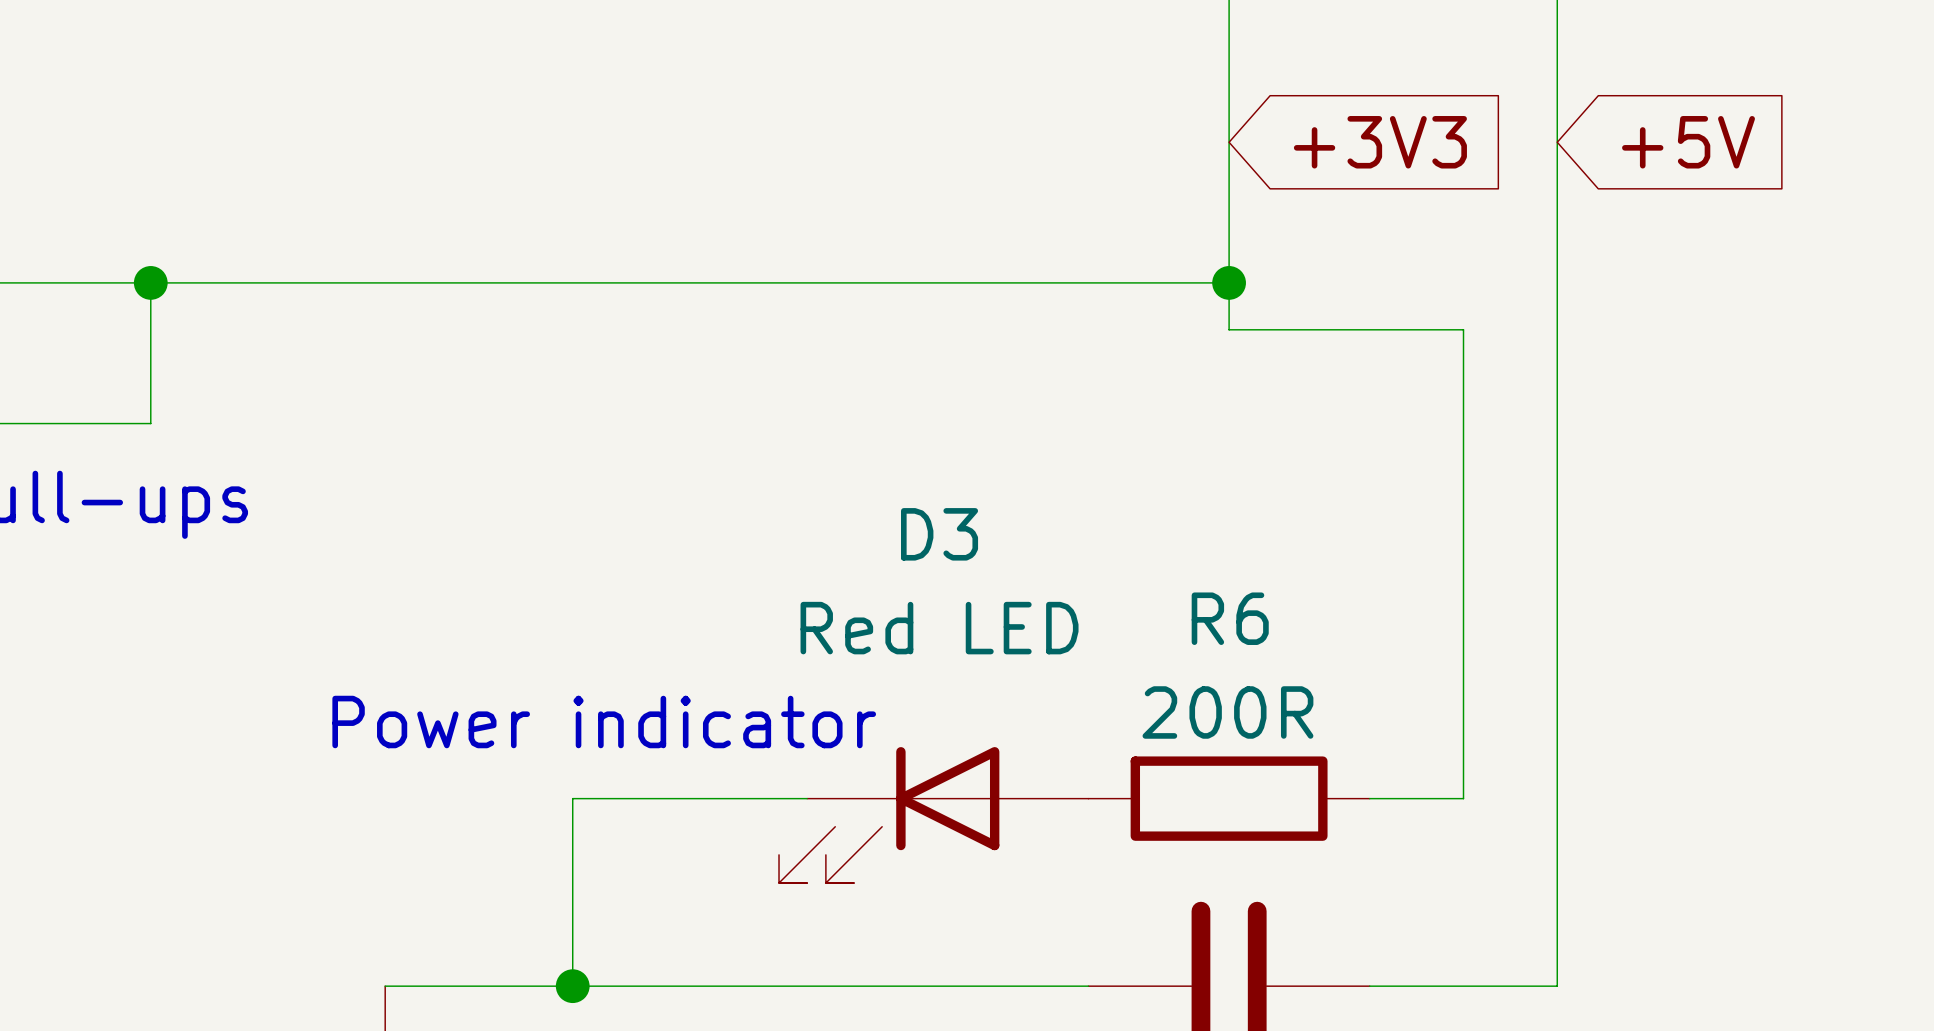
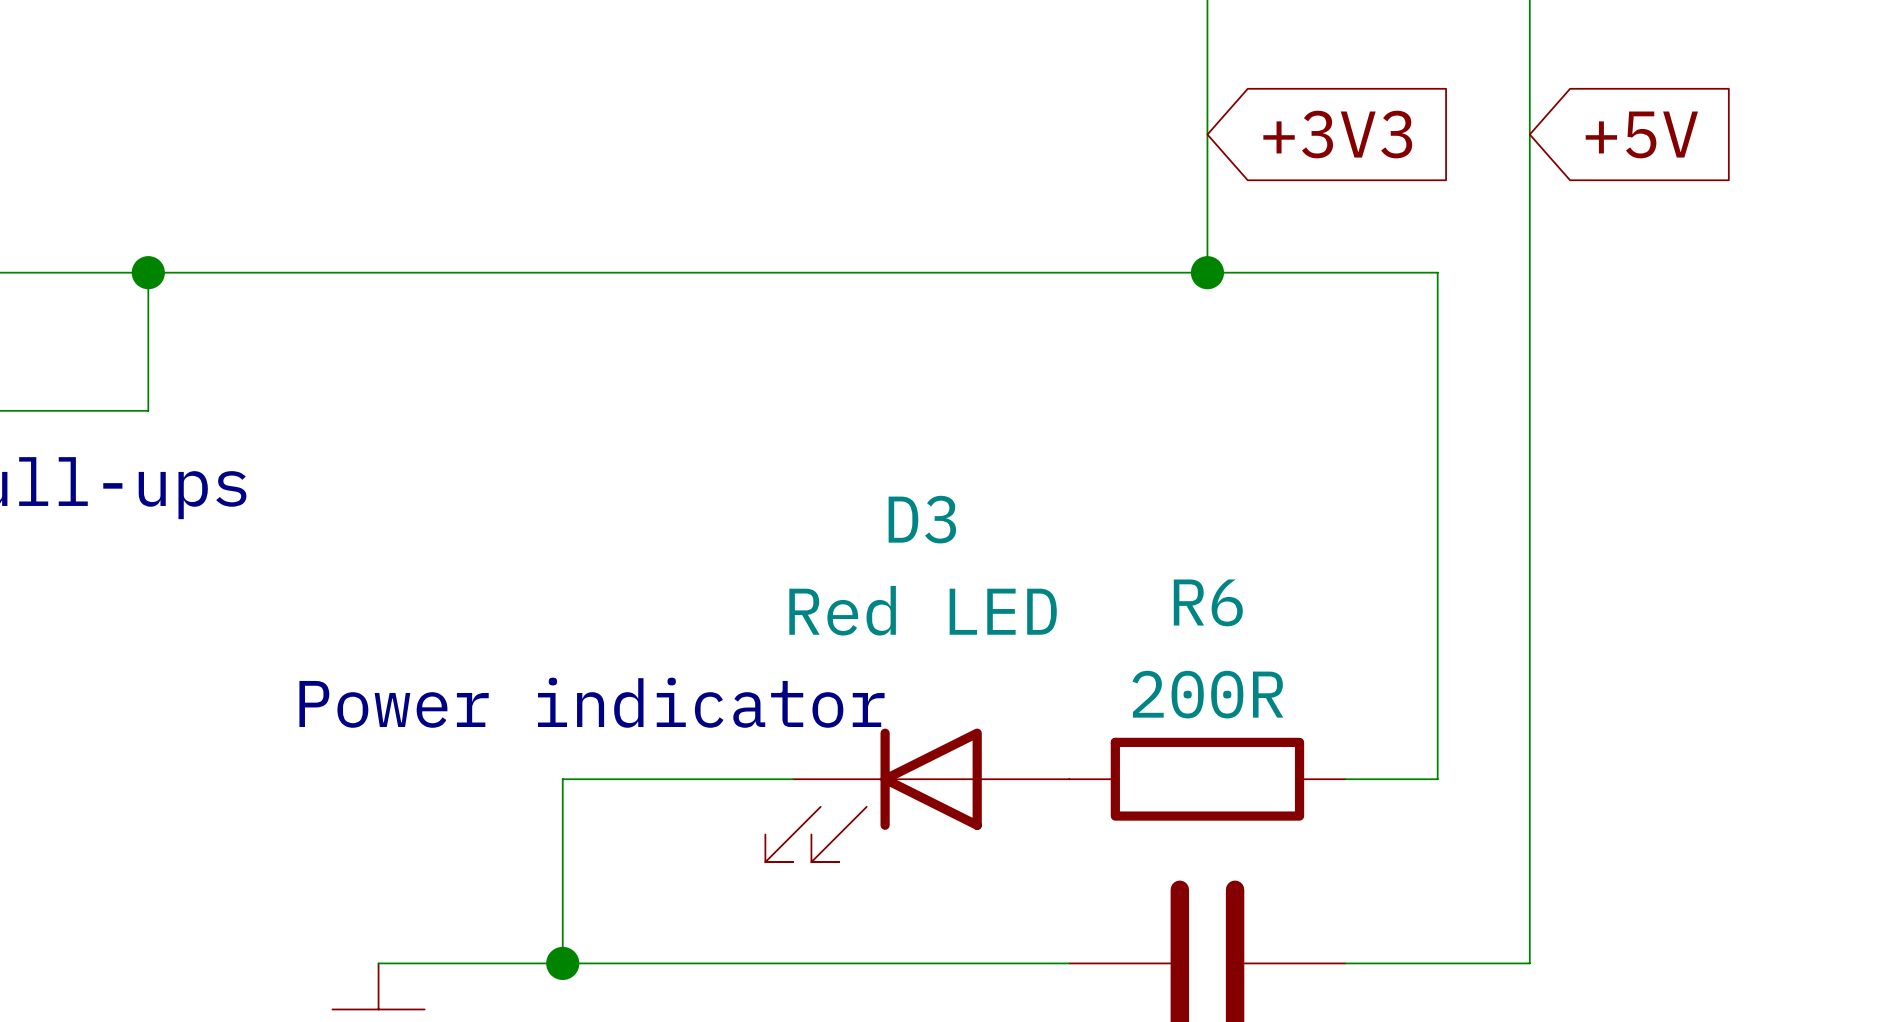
wire: (1229, 282) (1229, 329) (1463, 329) -> (1207, 272) (1437, 272) (1437, 318)

